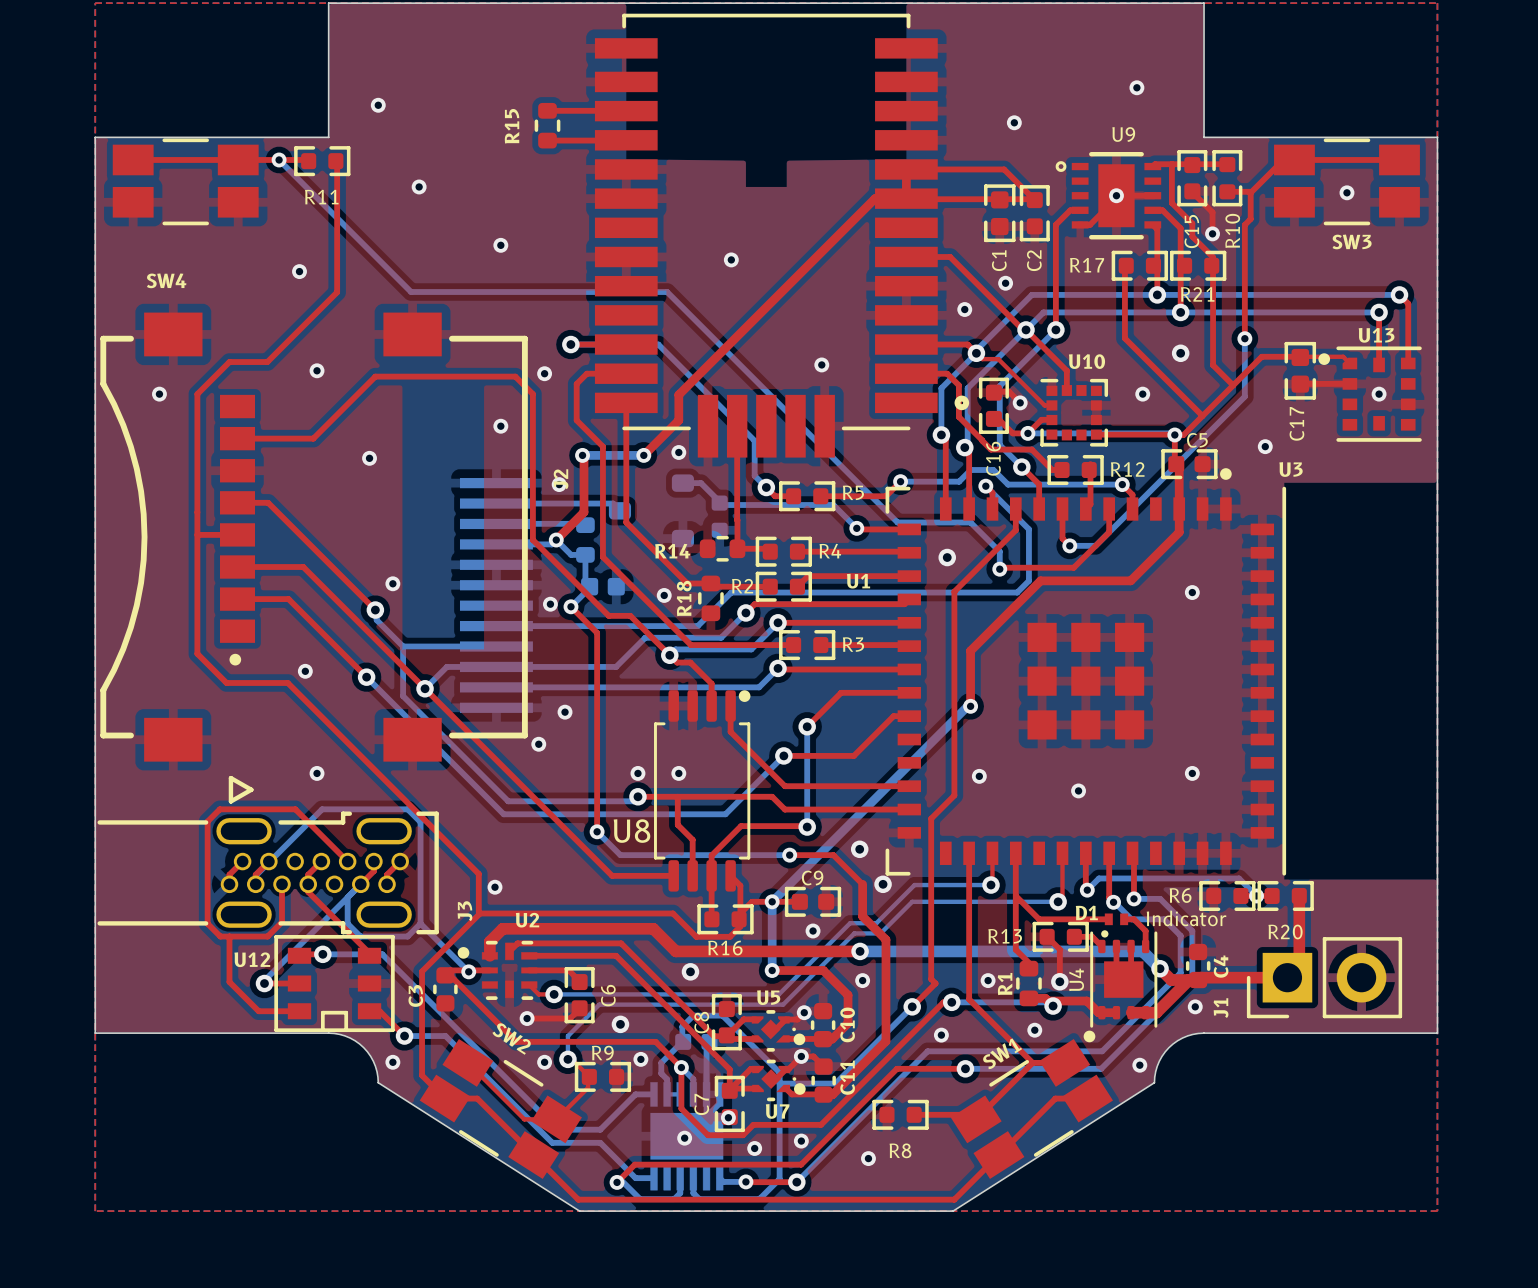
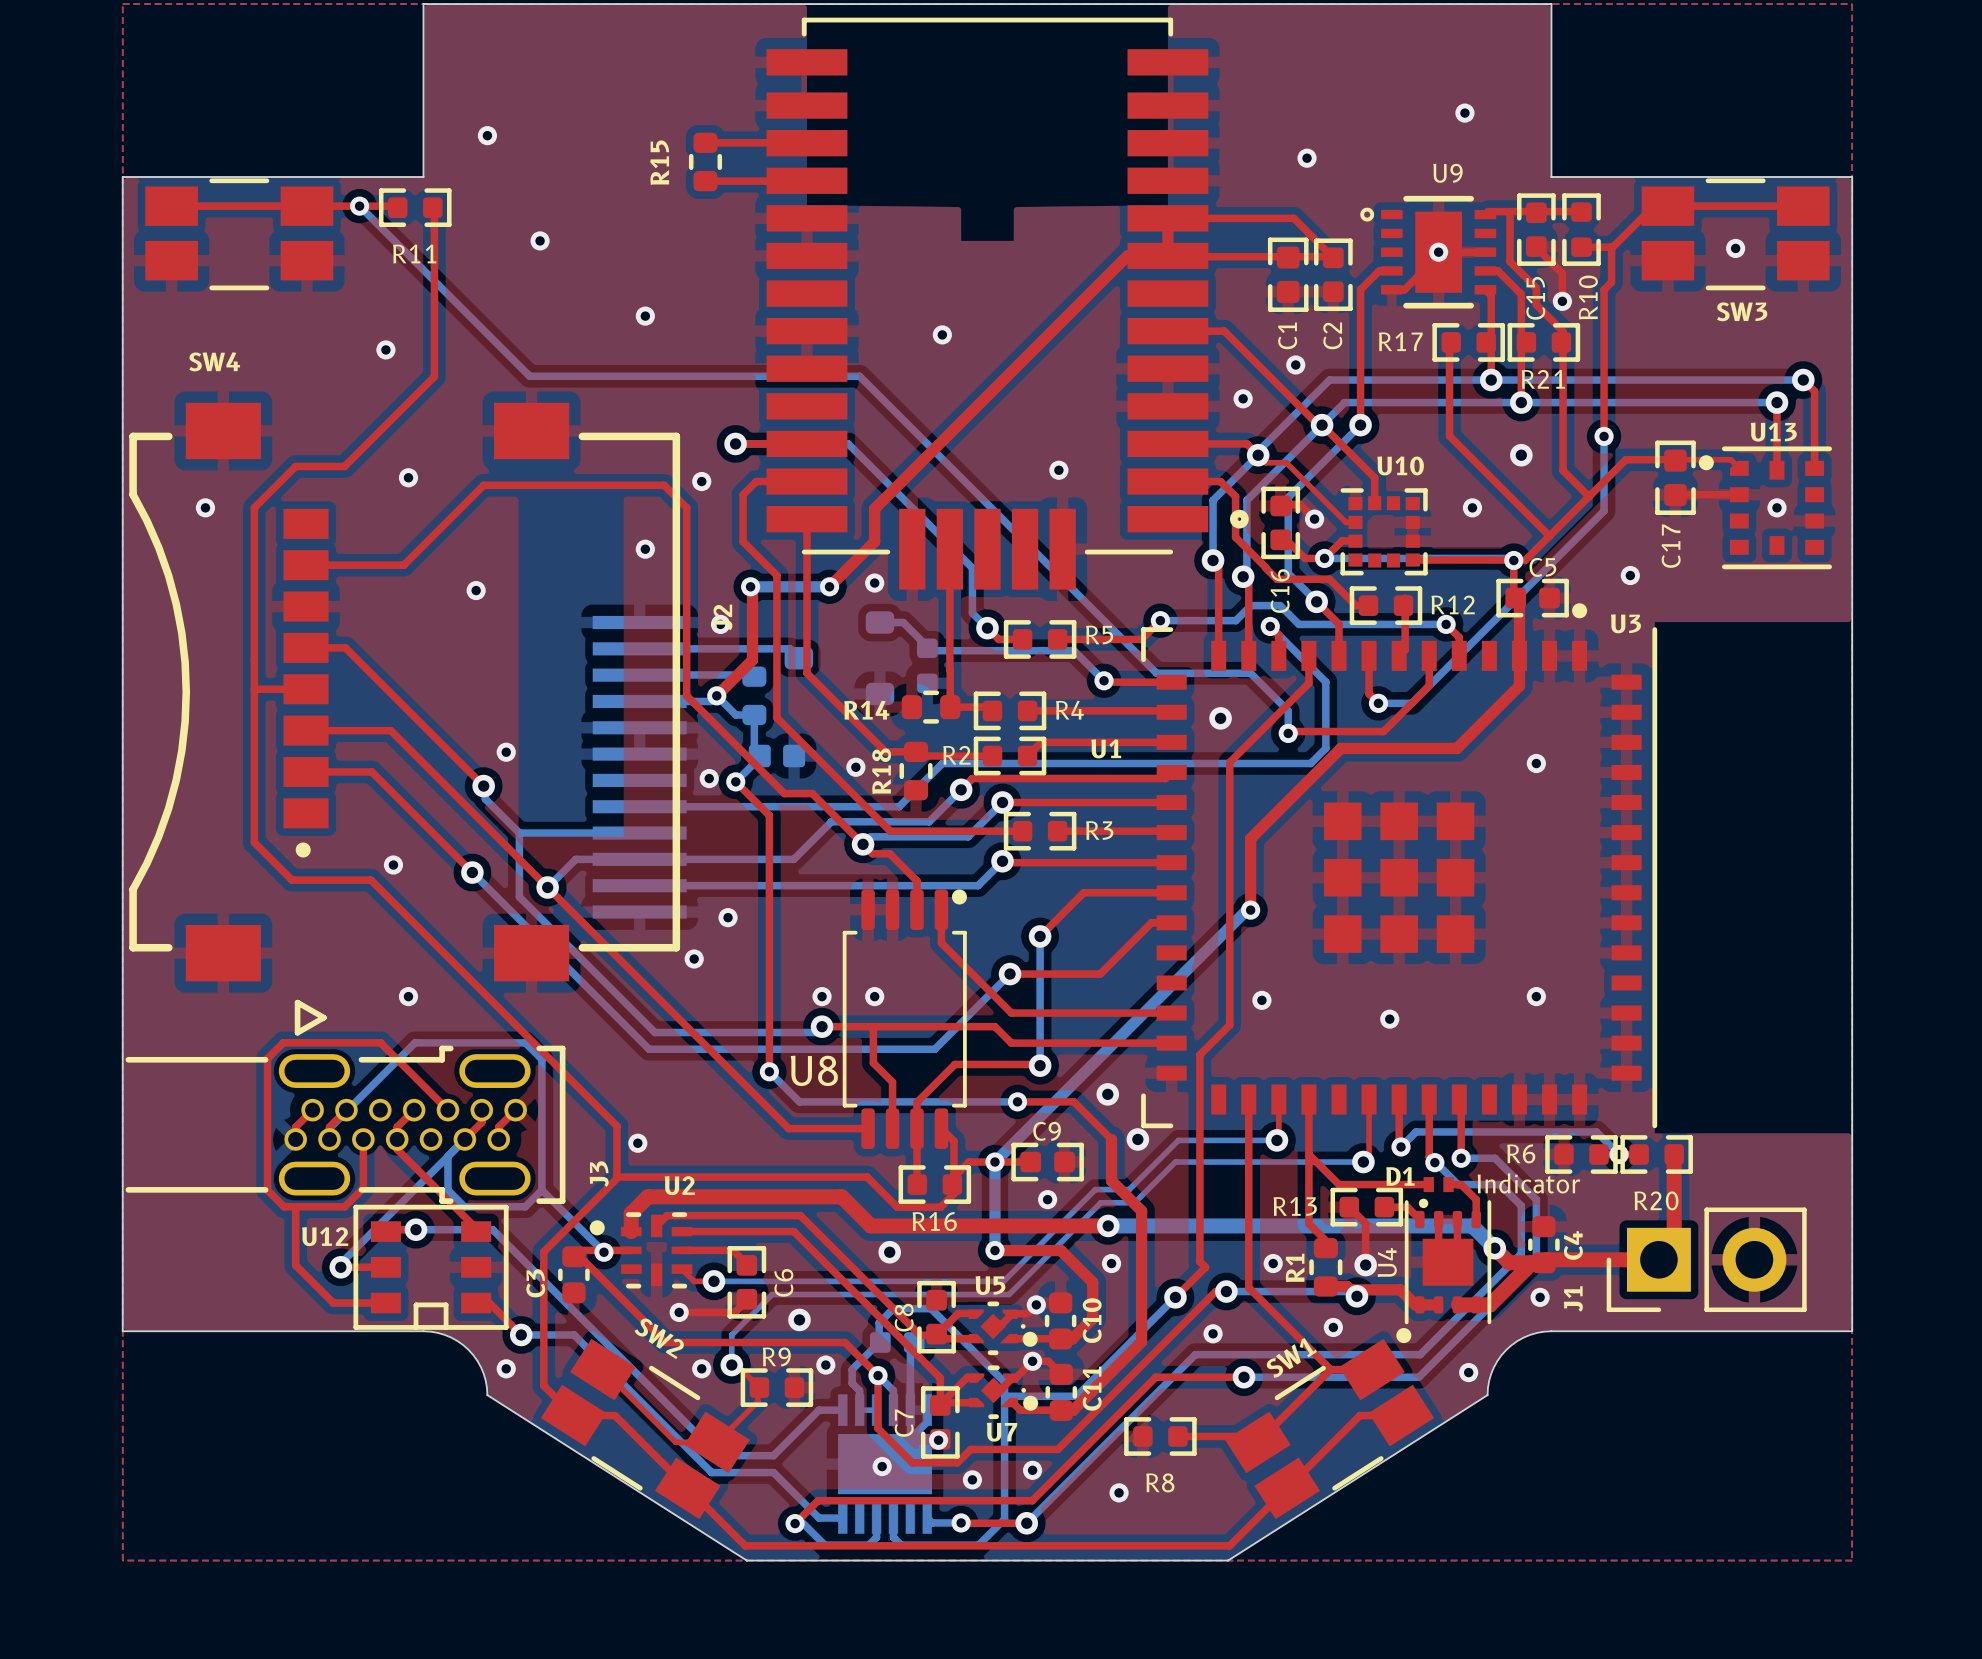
U3 name position: U3 (1291, 469) -> U3 (1625, 623)

